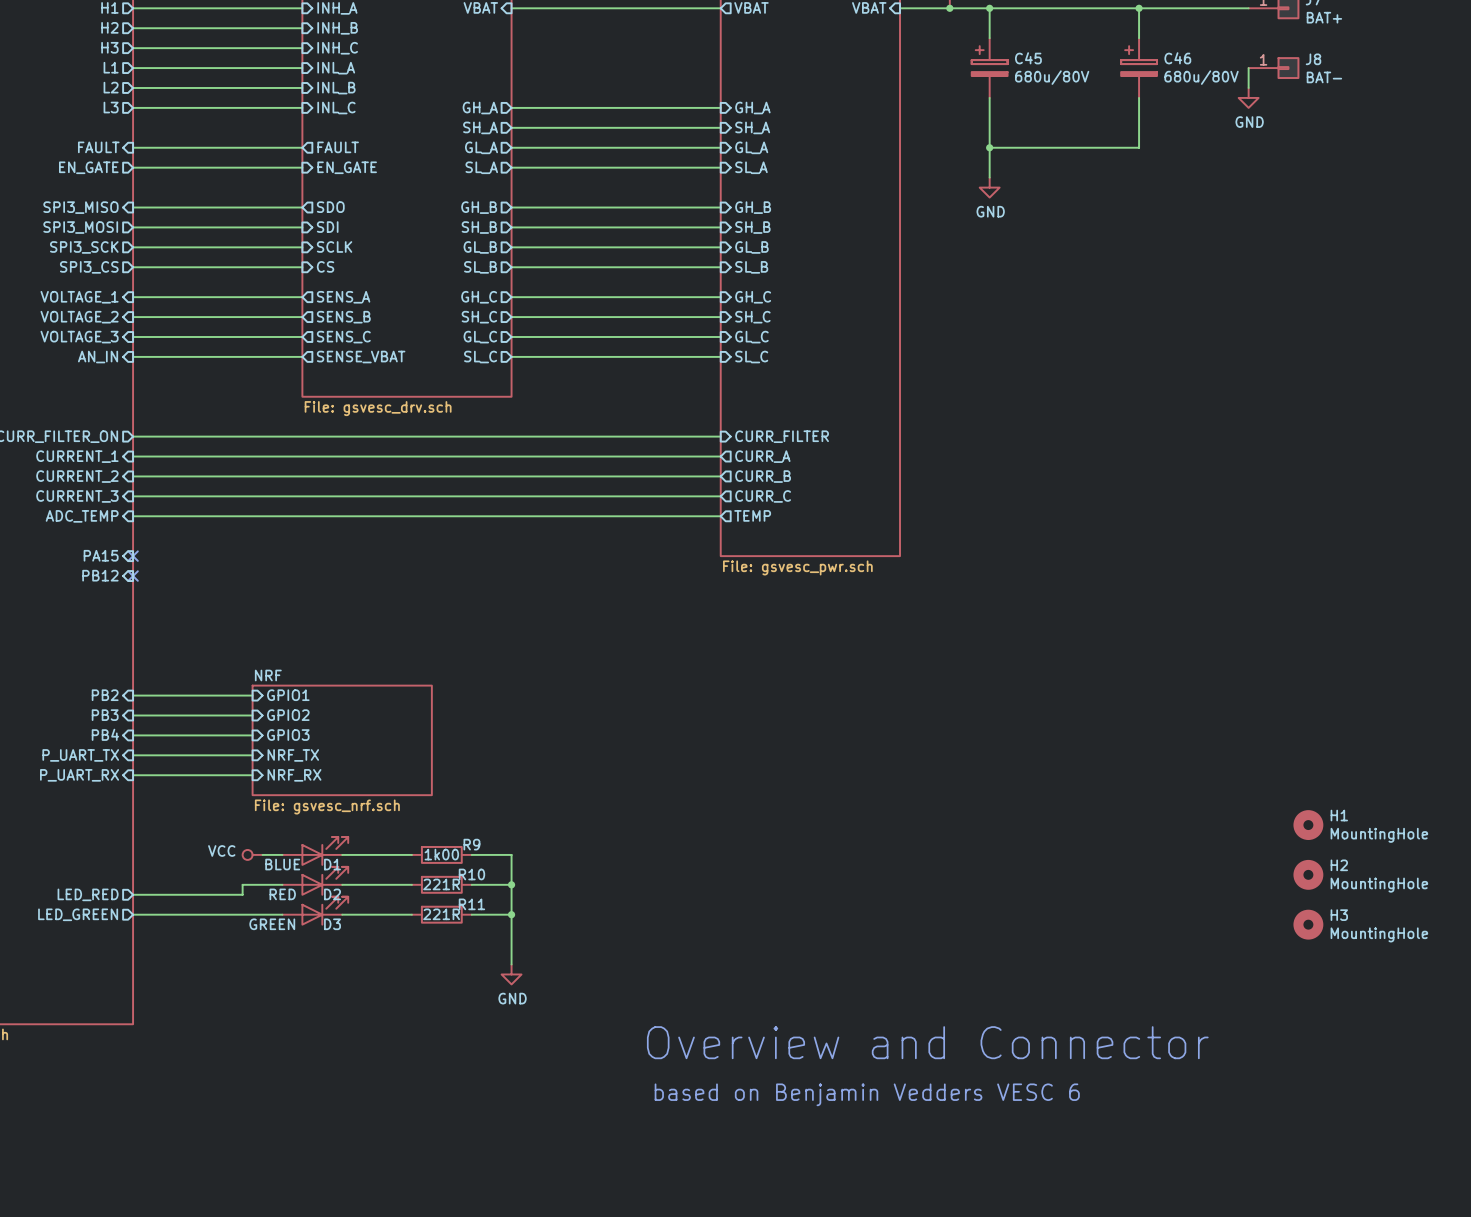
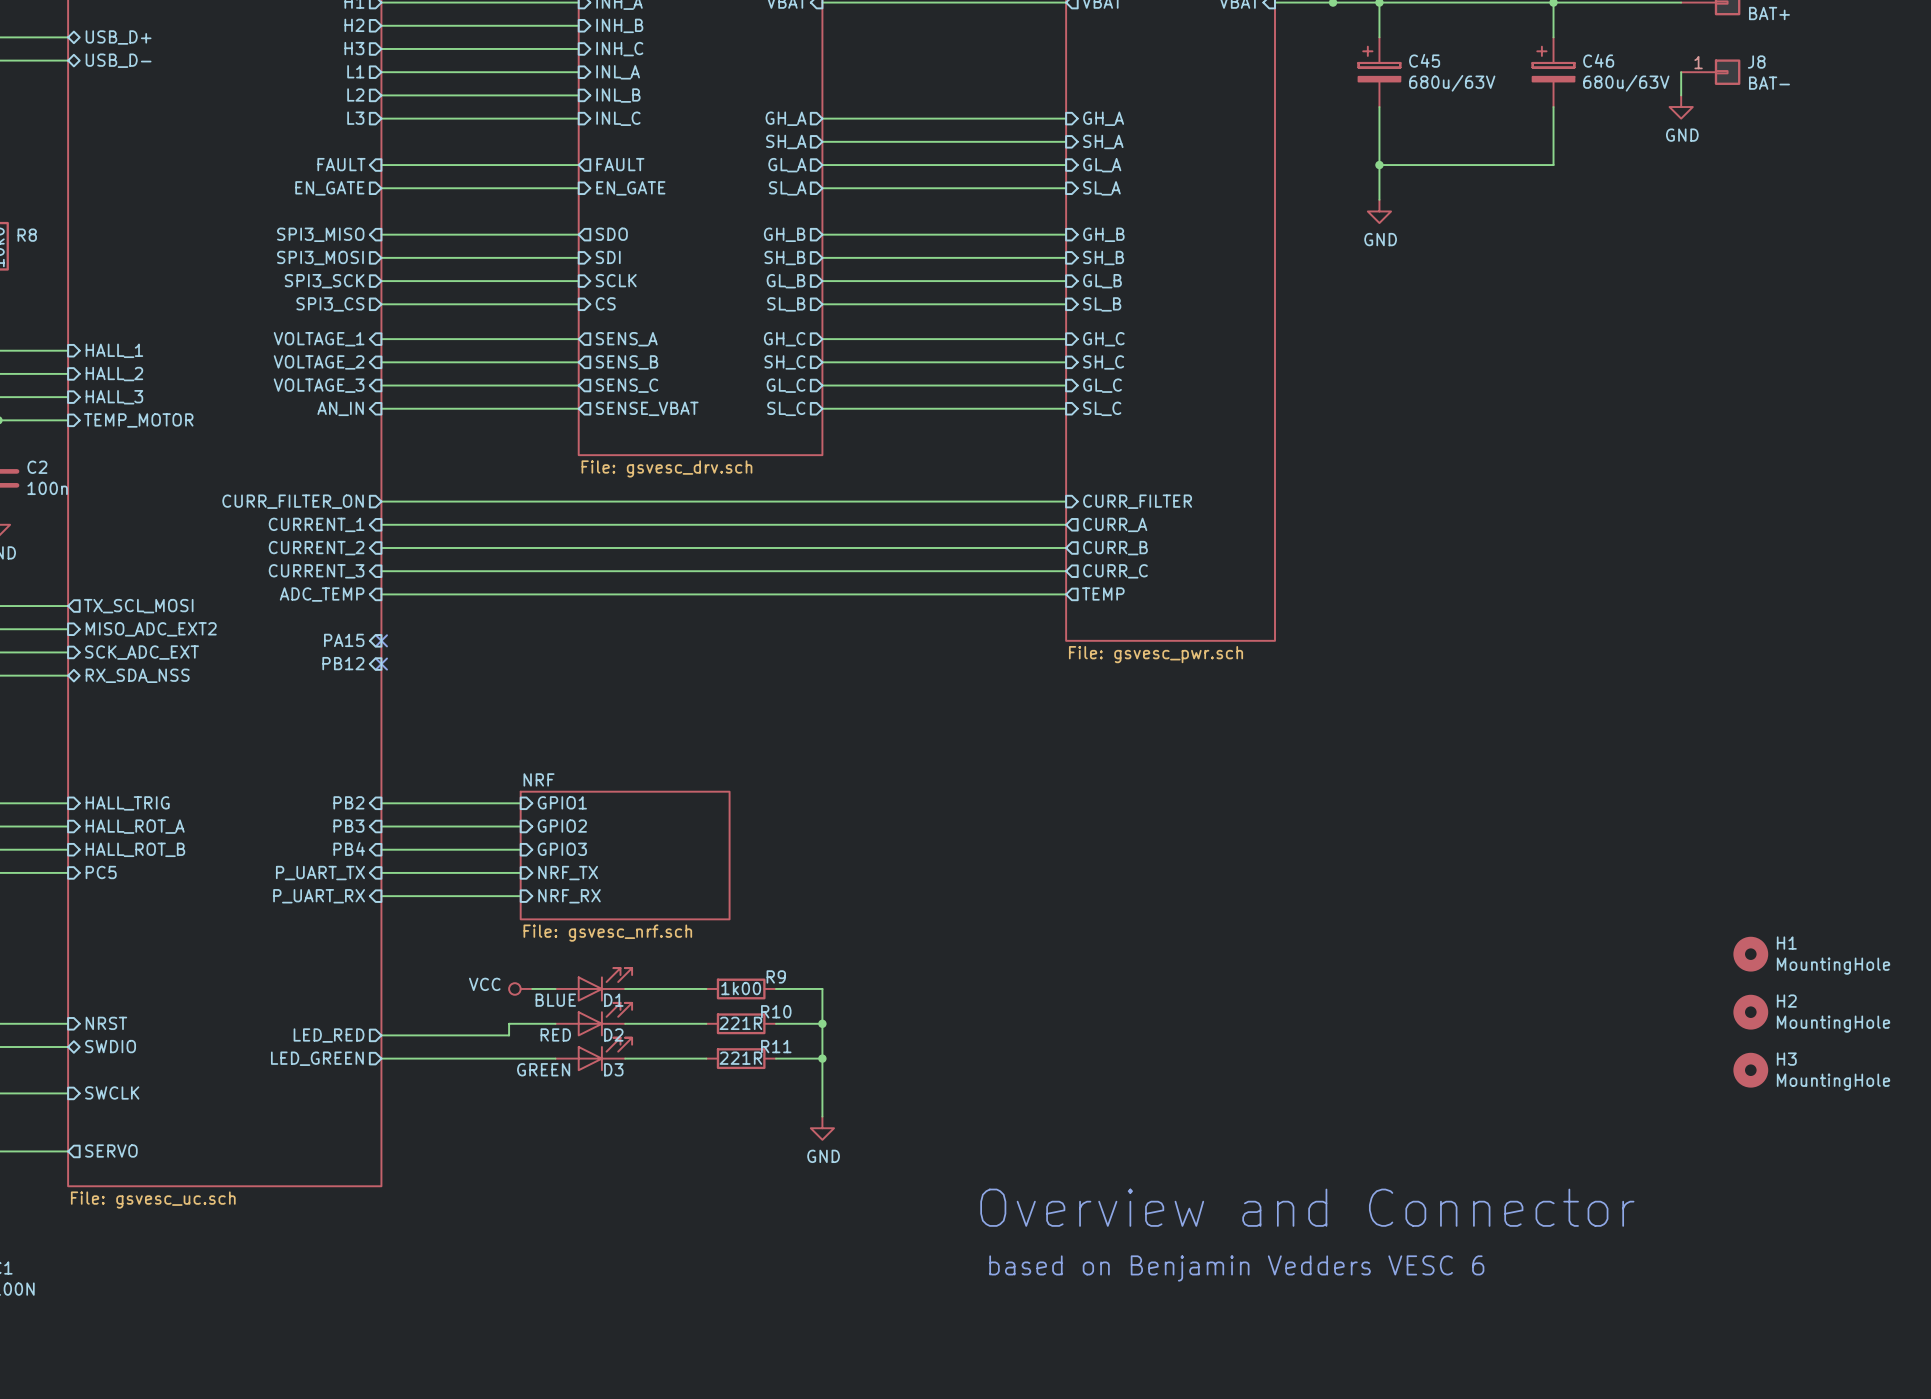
C45 value: 680u/80V (1052, 77) -> 680u/63V (1452, 83)
C46 value: 680u/80V (1201, 77) -> 680u/63V (1626, 83)

